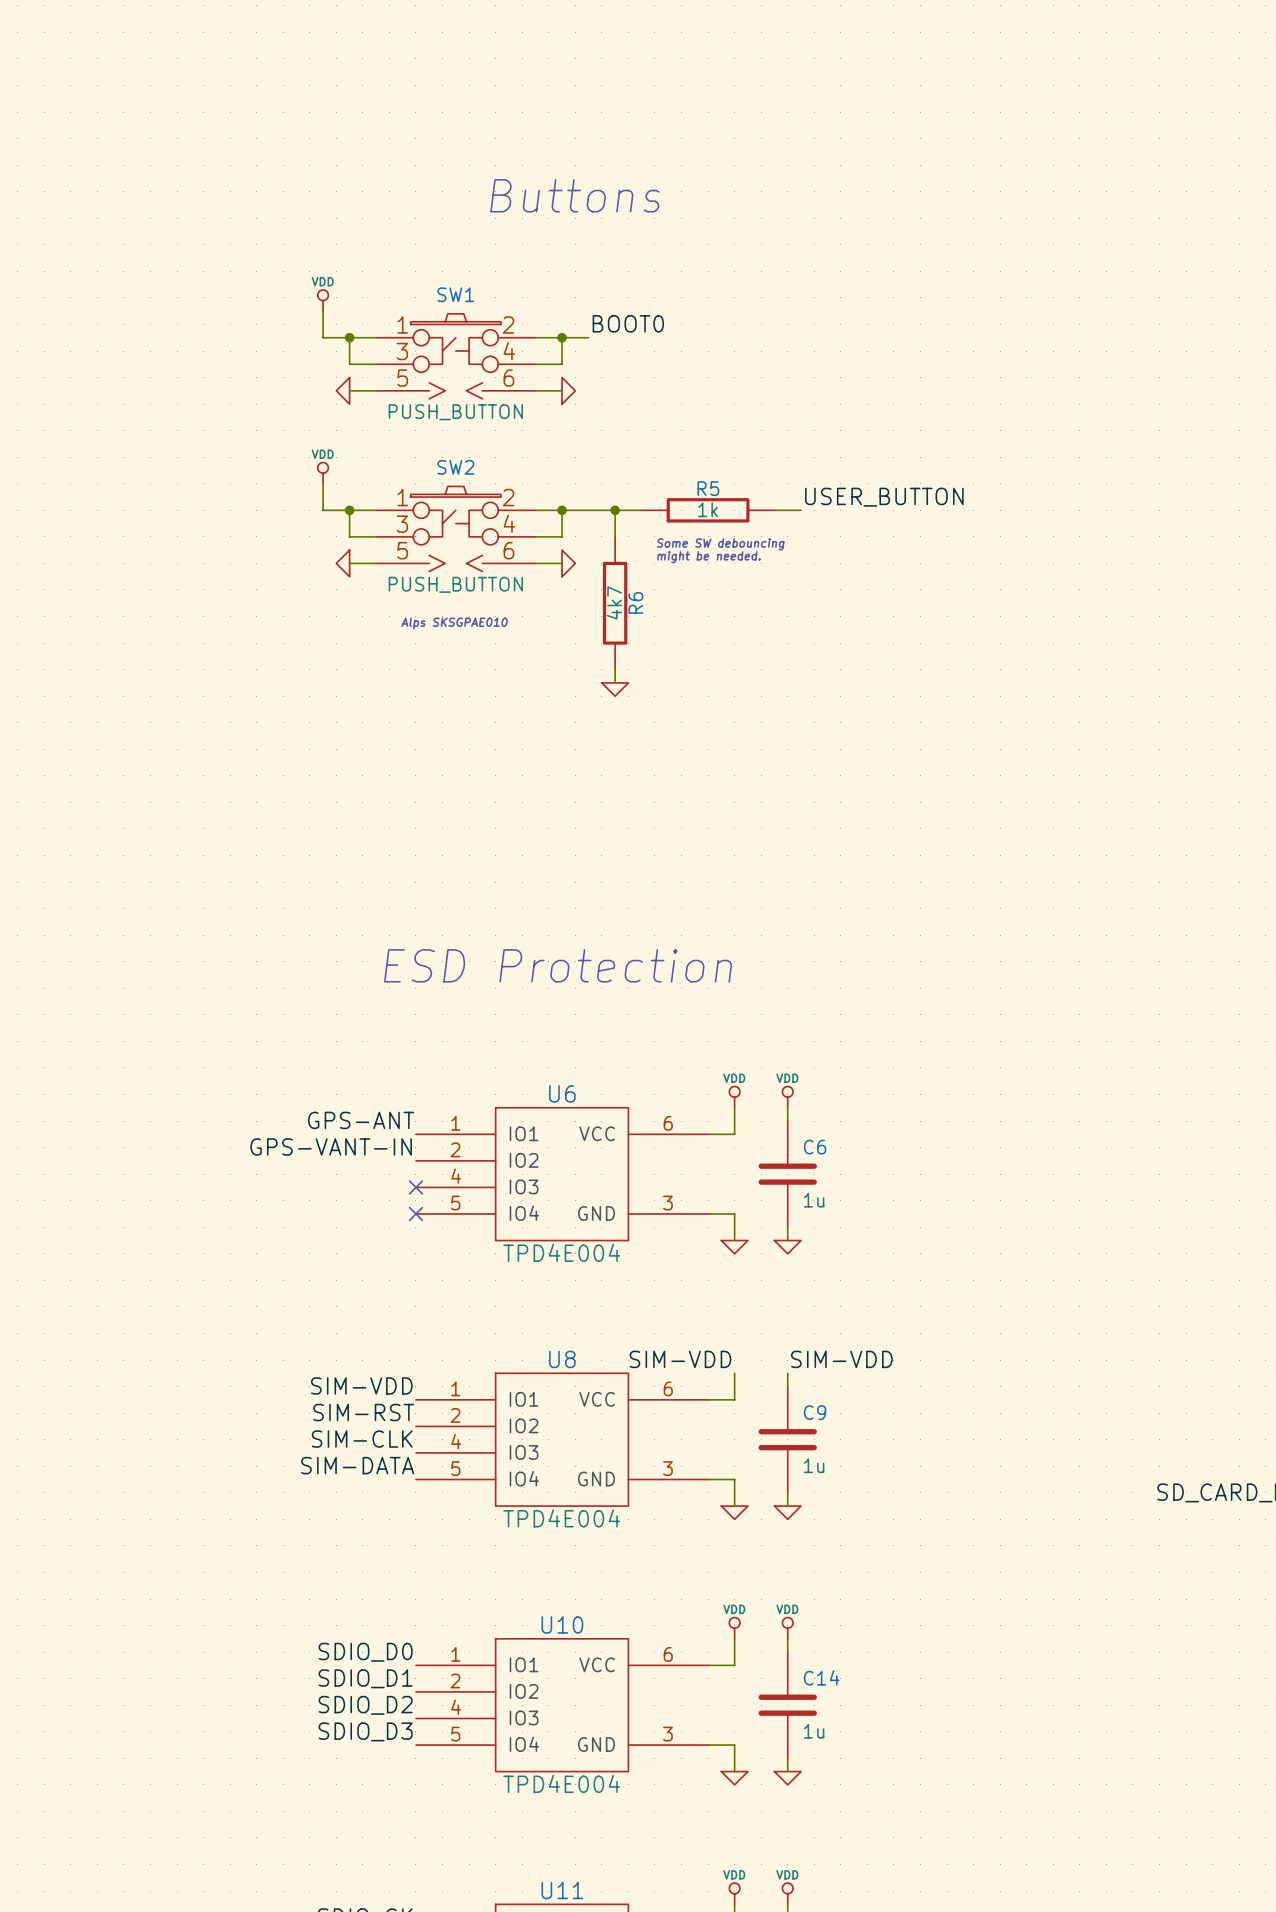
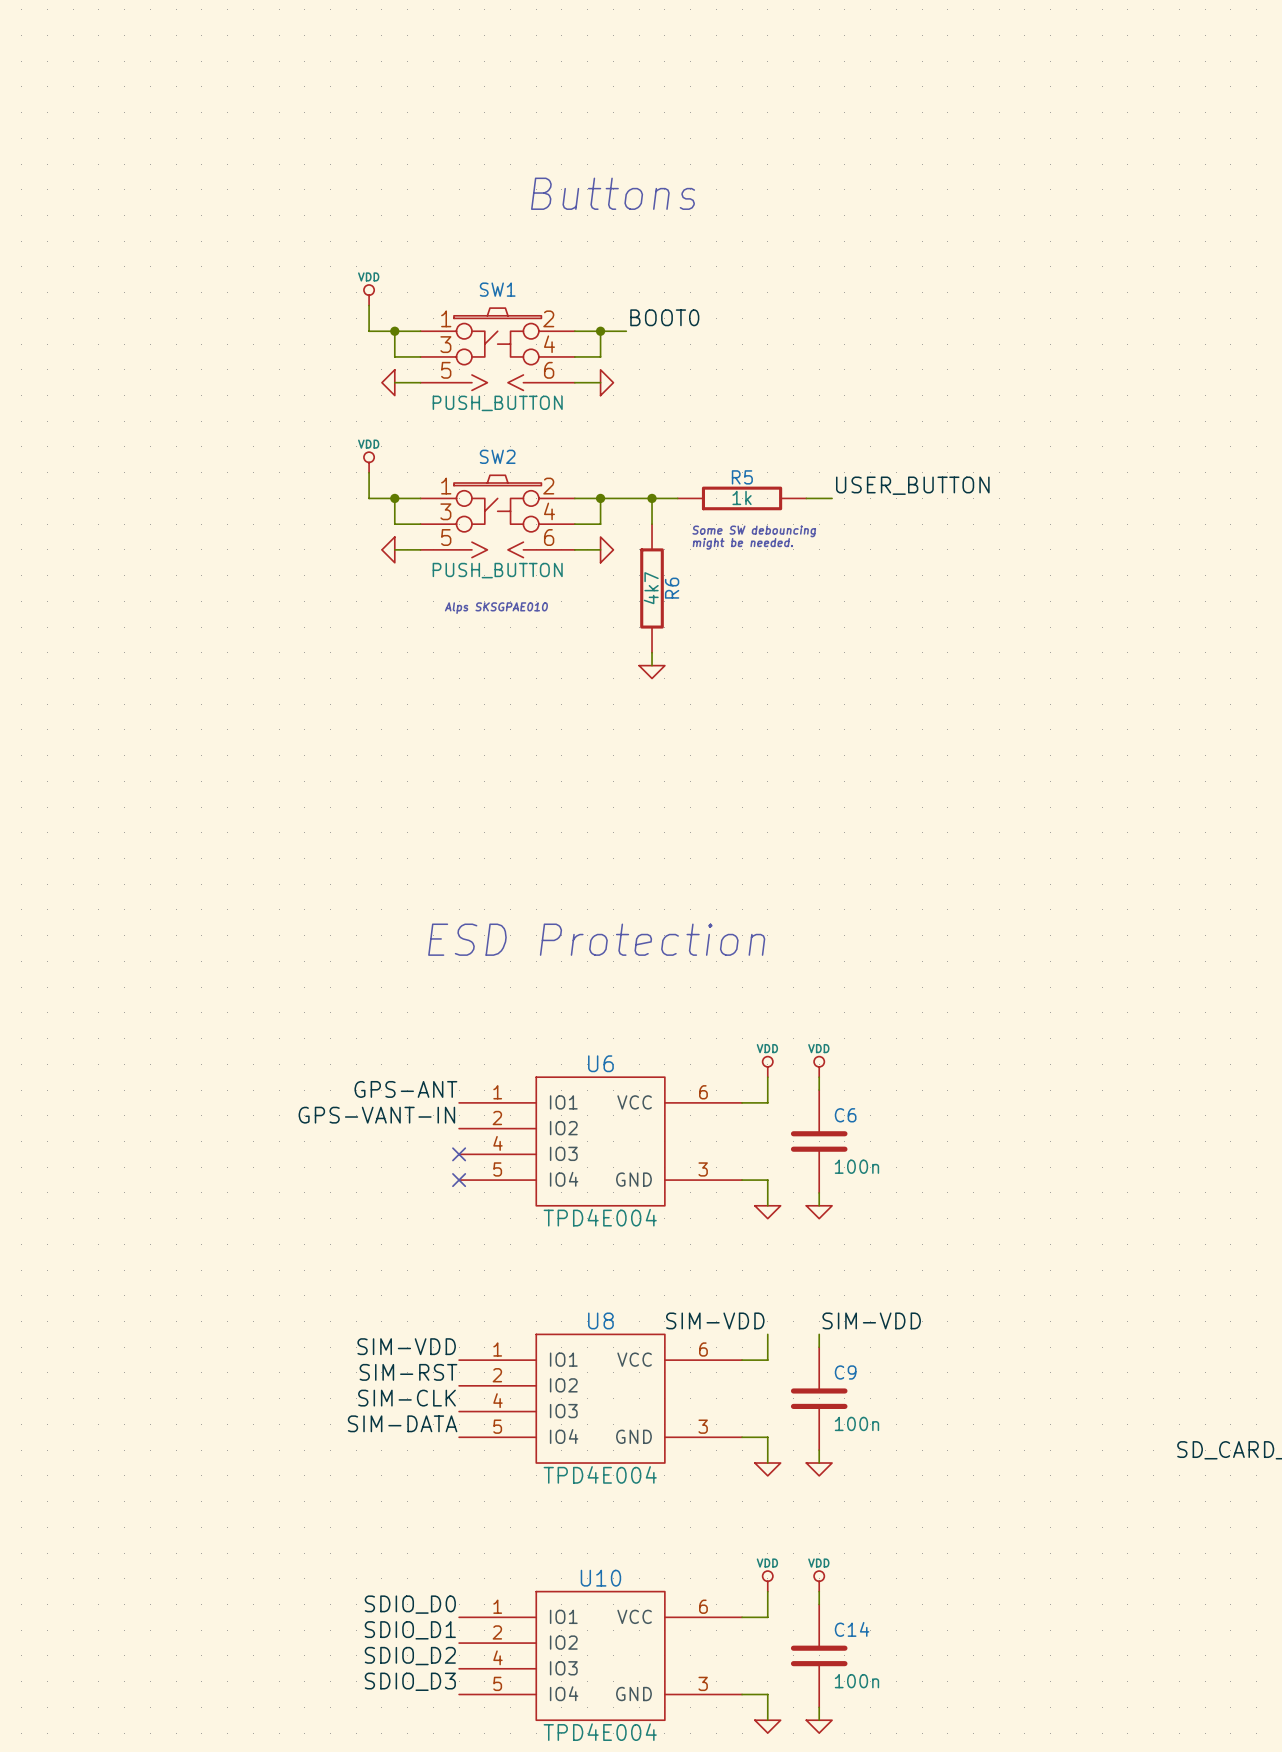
C6 value: 1u (814, 1200) -> 100n (856, 1166)
C9 value: 1u (814, 1465) -> 100n (856, 1423)
C14 value: 1u (814, 1731) -> 100n (856, 1681)

